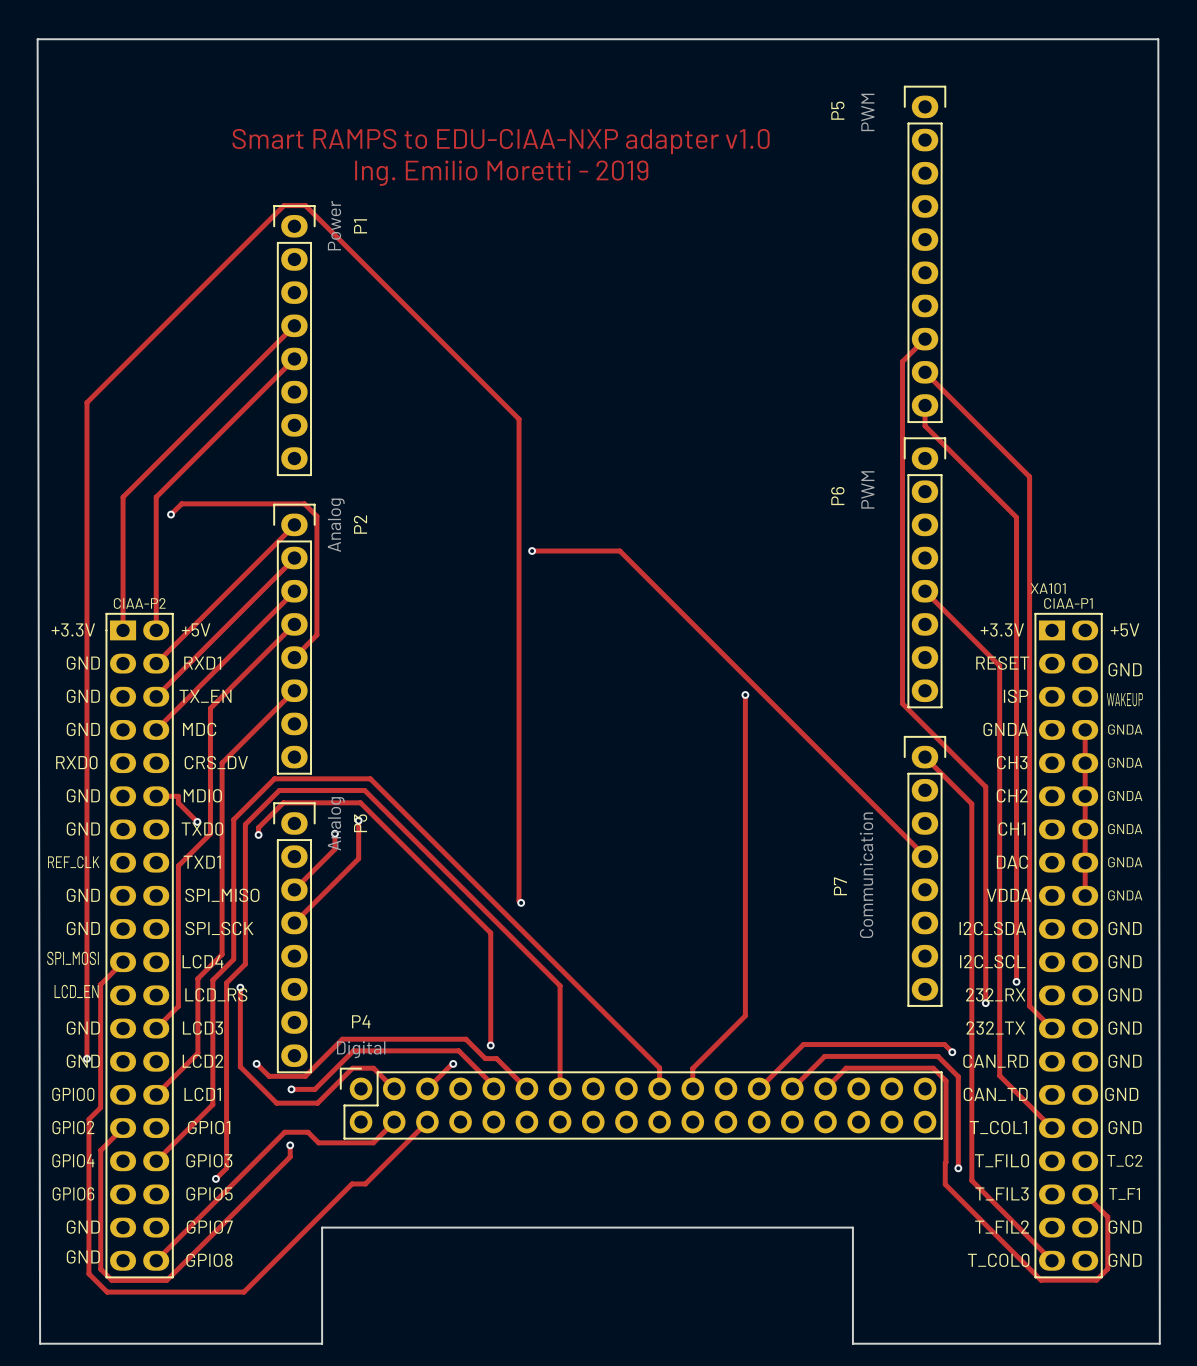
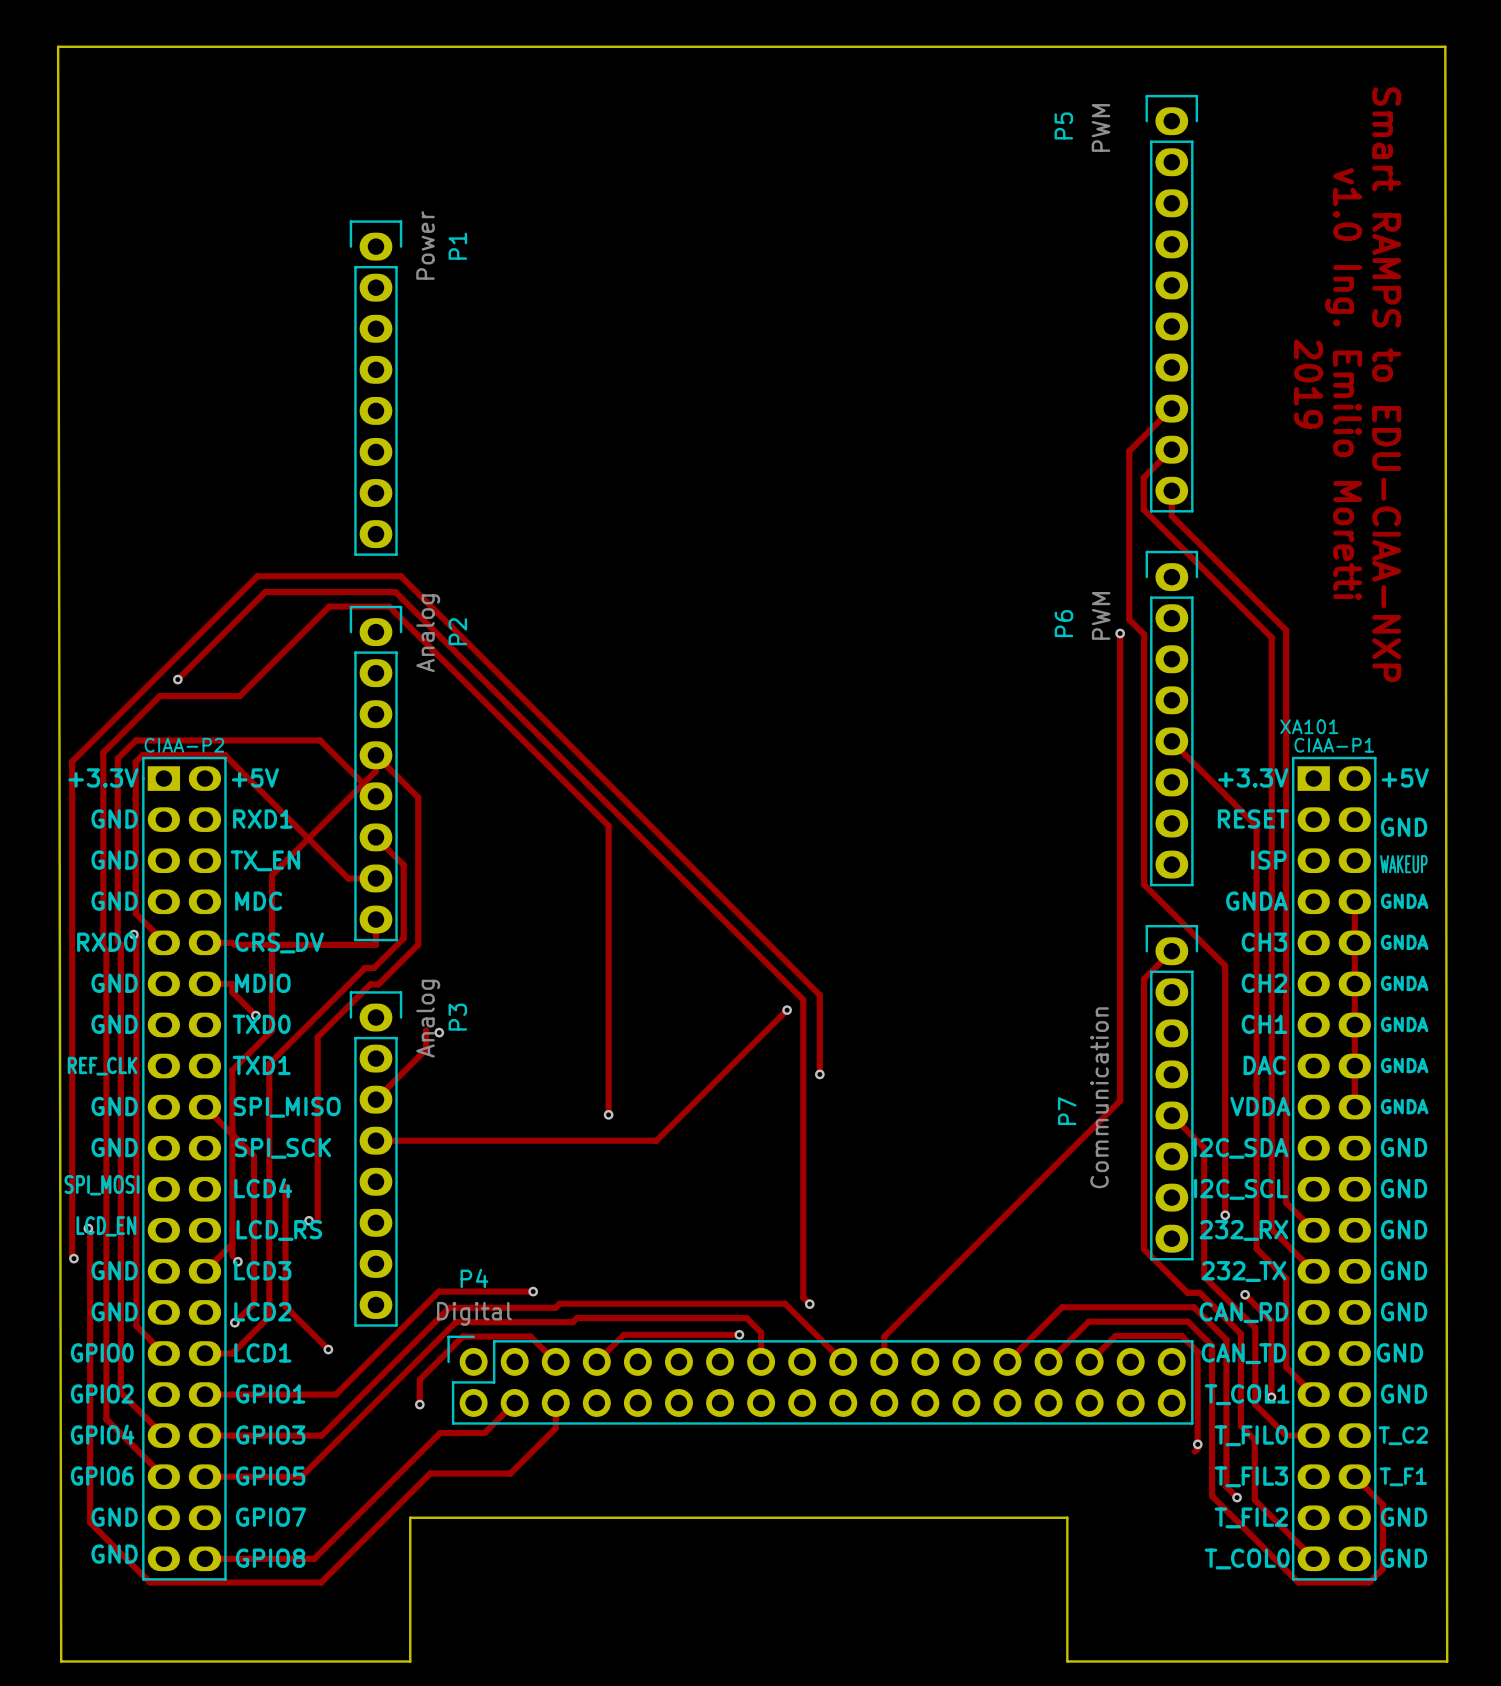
text: Smart RAMPS to EDU-CIAA-NXP adapter v1.0 (501, 141) -> none
text: Ing. Emilio Moretti - 2019 (501, 173) -> none
P5 position: (925, 254) -> (1171, 303)
text: none -> v1.0 Ing. Emilio Moretti (1343, 384)
text: none -> 2019 (1308, 384)
text: none -> Smart RAMPS to EDU-CIAA-NXP (1386, 384)
track: (294, 325) (123, 497) (123, 630) -> none
track: (925, 339) (902, 361) (902, 703) (914, 716) -> (1171, 408) (1129, 451) (1129, 619) (1144, 634) (1144, 884)
P1 position: (294, 340) -> (375, 388)
track: (294, 358) (156, 497) (156, 630) -> none
track: (925, 372) (1029, 476) (1029, 1006) -> (1171, 449) (1143, 477) (1143, 509) (1271, 637) (1271, 1229) (1286, 1243)
track: none -> (1171, 490) (1171, 516) (1286, 630) (1286, 1202) (1313, 1230)
track: (925, 405) (925, 425) (1016, 517) (1016, 981) -> none
track: none -> (1120, 633) (1120, 1100) (884, 1336) (884, 1361)
via: none -> (1120, 633)
track: (171, 514) (181, 503) (304, 503) (316, 516) (316, 635) (294, 657) -> none
via position: (171, 514) -> (177, 679)
track: (294, 524) (156, 663) -> none
track: none -> (177, 679) (265, 592) (395, 592) (803, 999) (803, 1297) (809, 1304)
track: (532, 551) (619, 551) (924, 856) -> none
via: (532, 551) -> none
track: (294, 558) (156, 696) -> none
P6 position: (924, 572) -> (1171, 718)
track: (294, 591) (156, 729) -> none
track: (924, 591) (999, 665) (999, 1075) (1029, 1105) -> (1171, 741) (1256, 826) (1256, 1248) (1286, 1278) (1286, 1367)
track: none -> (375, 755) (418, 797) (418, 944) (378, 984) (370, 984) (317, 1037) (317, 1220)
P2 position: (294, 639) -> (375, 773)
track: none -> (375, 796) (320, 740) (135, 740) (117, 758) (117, 941) (120, 944) (120, 1392) (163, 1435)
track: (294, 690) (222, 763) (222, 954) (197, 978) (197, 1053) (156, 1094) -> (375, 837) (403, 865) (403, 938) (374, 967) (365, 967) (269, 1063) (269, 1316) (232, 1353) (204, 1353)
track: (745, 694) (745, 1015) (692, 1068) (692, 1088) -> none
via: (745, 694) -> none
track: none -> (375, 878) (348, 878) (224, 754) (142, 754) (135, 761) (135, 913) (163, 942)
track: none -> (375, 919) (375, 944) (234, 944) (232, 942) (204, 942)
track: none -> (133, 934) (136, 936) (136, 1325) (163, 1353)
via: none -> (133, 934)
track: (924, 757) (971, 803) (971, 1180) (1004, 1213) -> (1171, 951) (1143, 979) (1143, 1249) (1187, 1292) (1199, 1292) (1240, 1333) (1240, 1425) (1254, 1439) (1254, 1499)
track: (980, 781) (985, 786) (985, 1003) -> (1225, 965) (1225, 1215)
via: none -> (787, 1010)
track: (358, 820) (358, 858) (294, 922) -> (787, 1010) (656, 1140) (375, 1140)
via: (358, 820) -> none
via: (334, 833) -> none
track: (258, 834) (258, 827) (283, 802) (360, 802) (490, 933) (490, 1045) -> none
via: (258, 834) -> none
via: none -> (439, 1032)
track: none -> (819, 1074) (819, 995) (400, 576) (257, 576) (72, 761) (72, 1256) (73, 1258)
via: none -> (819, 1074)
P7 position: (924, 871) -> (1171, 1092)
track: none -> (204, 1107) (254, 1156) (254, 1303) (234, 1322)
track: none -> (608, 1114) (608, 825) (389, 606) (329, 606) (239, 696) (159, 696) (103, 752) (103, 947) (106, 950) (106, 1419) (163, 1476)
track: (521, 902) (519, 900) (519, 419) (305, 205) (283, 205) (86, 402) (86, 1058) -> none
via position: (521, 902) -> (608, 1114)
track: none -> (1171, 1115) (1204, 1147) (1204, 1276) (1255, 1327) (1255, 1404) (1286, 1435) (1313, 1435)
track: none -> (285, 1186) (285, 1306) (328, 1349)
track: (123, 962) (100, 984) (100, 1107) (88, 1119) (88, 1273) (107, 1292) (243, 1292) (352, 1183) (365, 1183) (427, 1122) -> none
via: (1016, 981) -> none
via: none -> (1225, 1215)
track: (240, 987) (240, 1066) (276, 1103) (317, 1103) (352, 1068) (373, 1068) (394, 1088) -> none
track: none -> (88, 1228) (90, 1230) (90, 1522) (149, 1582) (321, 1582) (430, 1473) (510, 1473) (555, 1428) (555, 1402)
via: none -> (88, 1228)
via: (985, 1003) -> none
via: none -> (73, 1258)
via: none -> (237, 1261)
track: none -> (533, 1291) (438, 1291) (335, 1394) (204, 1394)
via: none -> (533, 1291)
via: (490, 1045) -> none
track: none -> (1245, 1294) (1271, 1321) (1271, 1397)
via: none -> (1245, 1294)
track: (952, 1052) (944, 1044) (803, 1044) (759, 1088) -> none
via: (952, 1052) -> none
via: none -> (809, 1304)
via: (86, 1058) -> none
track: (256, 1063) (269, 1076) (305, 1076) (342, 1039) (465, 1039) (485, 1058) (496, 1058) (526, 1088) -> none
via: (256, 1063) -> none
track: (453, 1063) (427, 1088) -> none
via: (453, 1063) -> none
via: none -> (234, 1322)
track: none -> (739, 1334) (623, 1334) (596, 1361)
via: none -> (739, 1334)
track: (493, 1088) (493, 1085) (458, 1050) (353, 1050) (314, 1089) (291, 1089) -> none
track: (560, 1088) (560, 985) (364, 790) (279, 790) (245, 824) (245, 964) (226, 982) (226, 1168) (215, 1178) -> none
track: (659, 1088) (659, 1068) (370, 778) (274, 778) (233, 819) (233, 959) (212, 980) (212, 1104) (156, 1161) -> (843, 1361) (785, 1303) (559, 1303) (555, 1307) (449, 1307) (321, 1435) (204, 1435)
track: (792, 1088) (824, 1056) (938, 1056) (958, 1076) (958, 1168) -> none
track: (825, 1088) (846, 1068) (933, 1068) (945, 1080) (945, 1184) (1041, 1280) (1096, 1280) (1107, 1268) (1107, 1217) -> (1048, 1361) (1088, 1321) (1187, 1321) (1212, 1345) (1212, 1496) (1298, 1582) (1369, 1582) (1383, 1568) (1382, 1504)
via: (291, 1089) -> none
via: none -> (328, 1349)
track: none -> (555, 1361) (530, 1336) (462, 1336) (419, 1379) (419, 1404)
track: none -> (761, 1361) (761, 1332) (746, 1318) (576, 1318) (572, 1322) (455, 1322) (301, 1476) (204, 1476)
track: none -> (1007, 1361) (1062, 1307) (1193, 1307) (1226, 1339) (1226, 1486) (1237, 1497)
track: none -> (1089, 1361) (1115, 1336) (1181, 1336) (1197, 1351) (1197, 1448) (1194, 1451)
P4 position: (641, 1103) -> (820, 1380)
track: (394, 1122) (373, 1142) (318, 1142) (307, 1132) (284, 1132) (156, 1260) -> (514, 1402) (484, 1433) (440, 1433) (314, 1558) (204, 1558)
track: (123, 1128) (100, 1150) (100, 1269) (111, 1280) (166, 1280) (290, 1156) (290, 1145) -> none
via: none -> (1271, 1397)
via: none -> (419, 1404)
via: (290, 1145) -> none
via: (215, 1178) -> none
via: none -> (1237, 1497)

